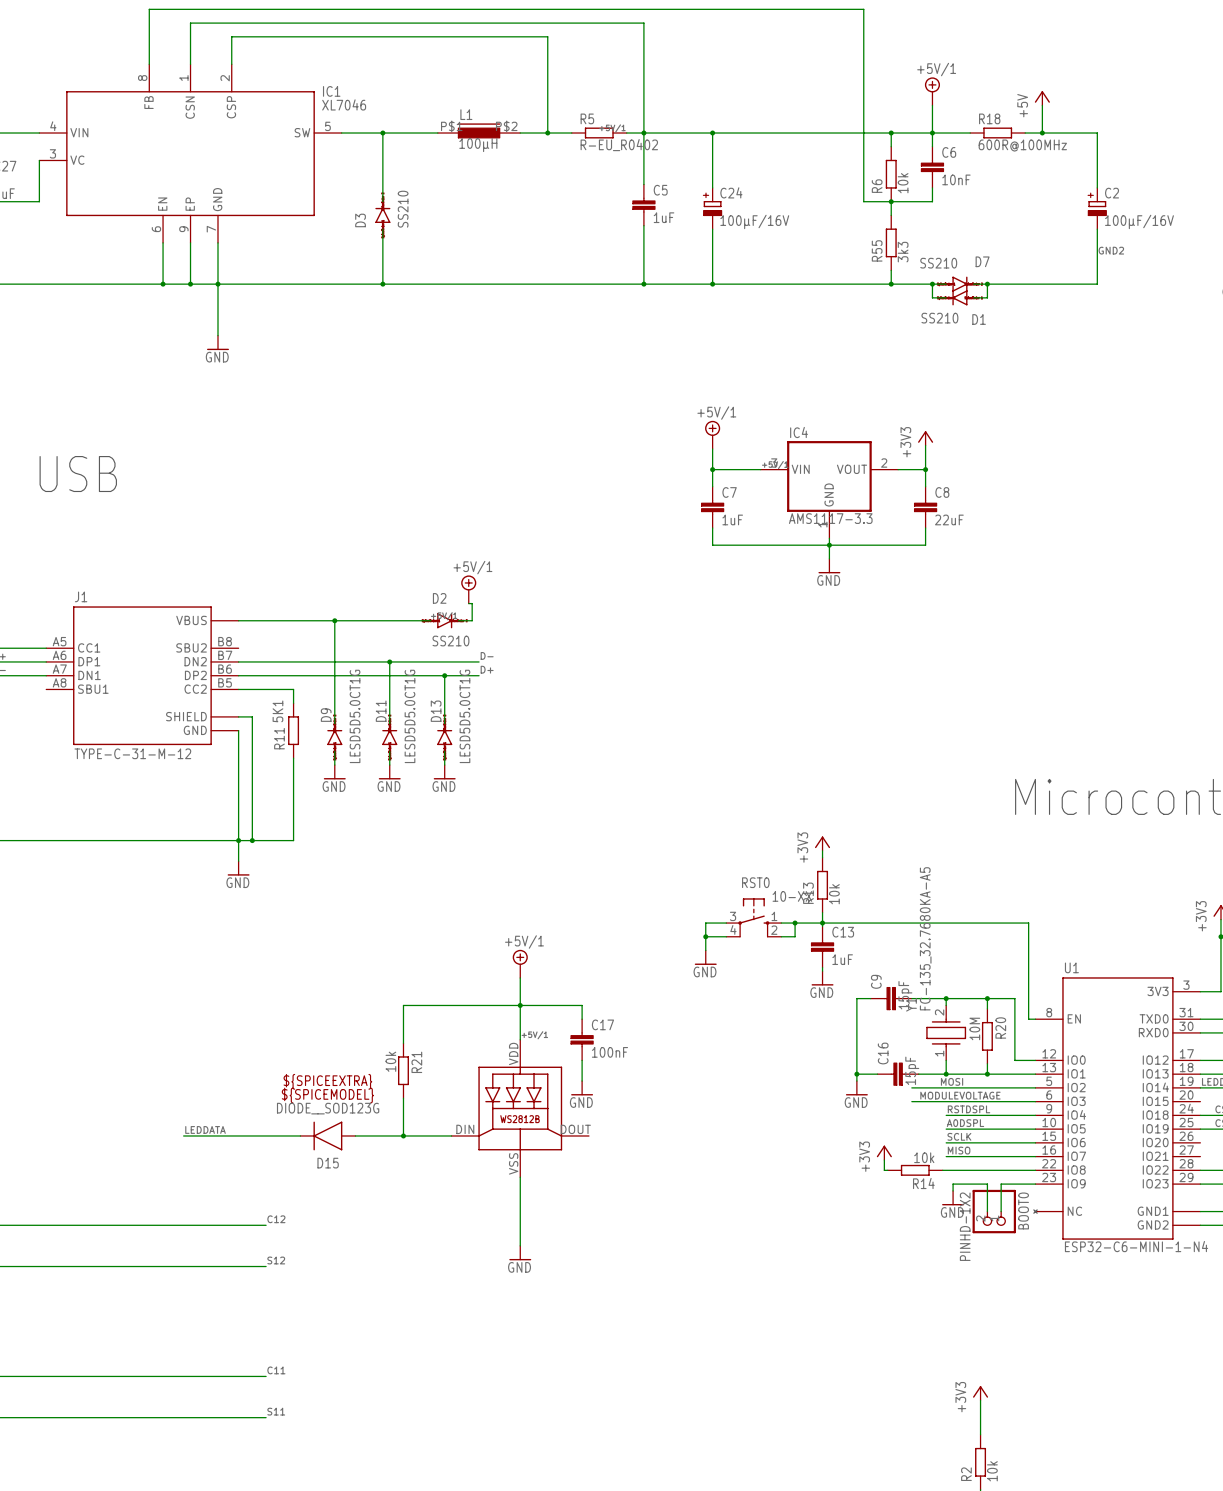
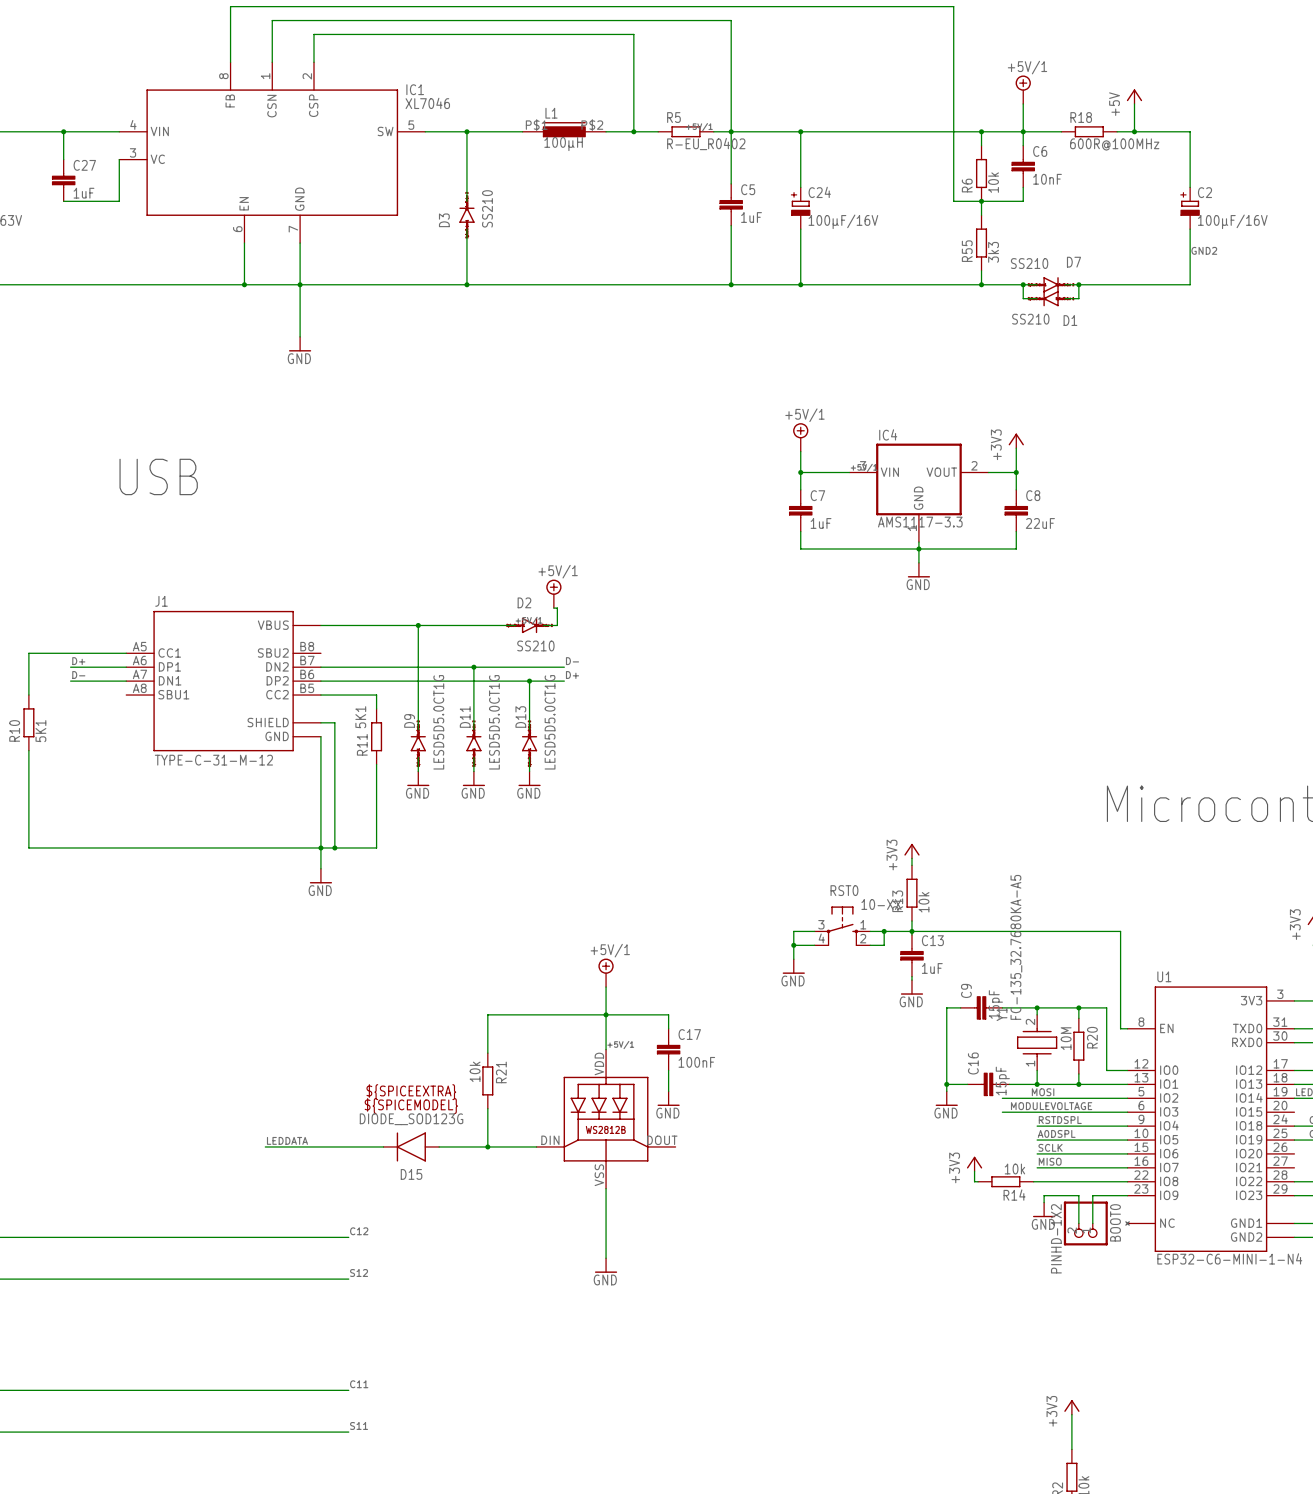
IC1 symbol: [39, 64, 342, 243] -> [119, 62, 426, 244]
wire: (190, 242) (190, 284) -> none
junction: (190, 284) -> none

